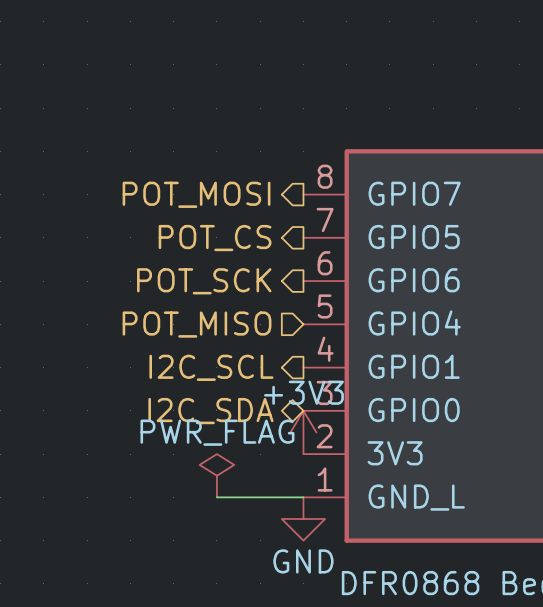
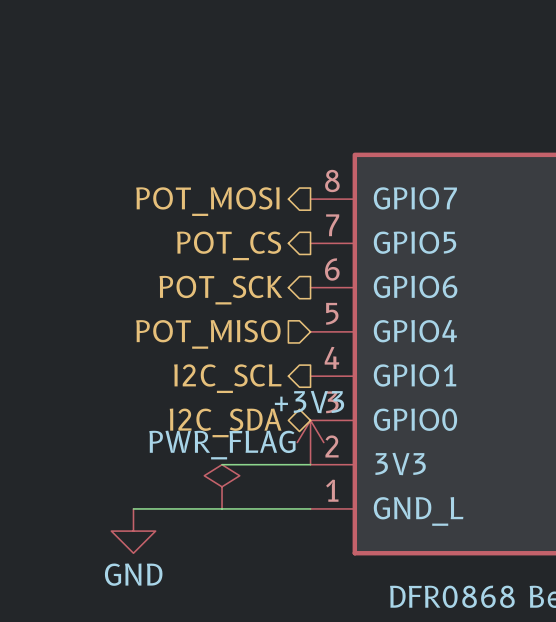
wire: none -> (222, 464) (310, 464)
wire: none -> (133, 508) (222, 508)
power symbol position: GND (303, 518) -> GND (133, 531)

